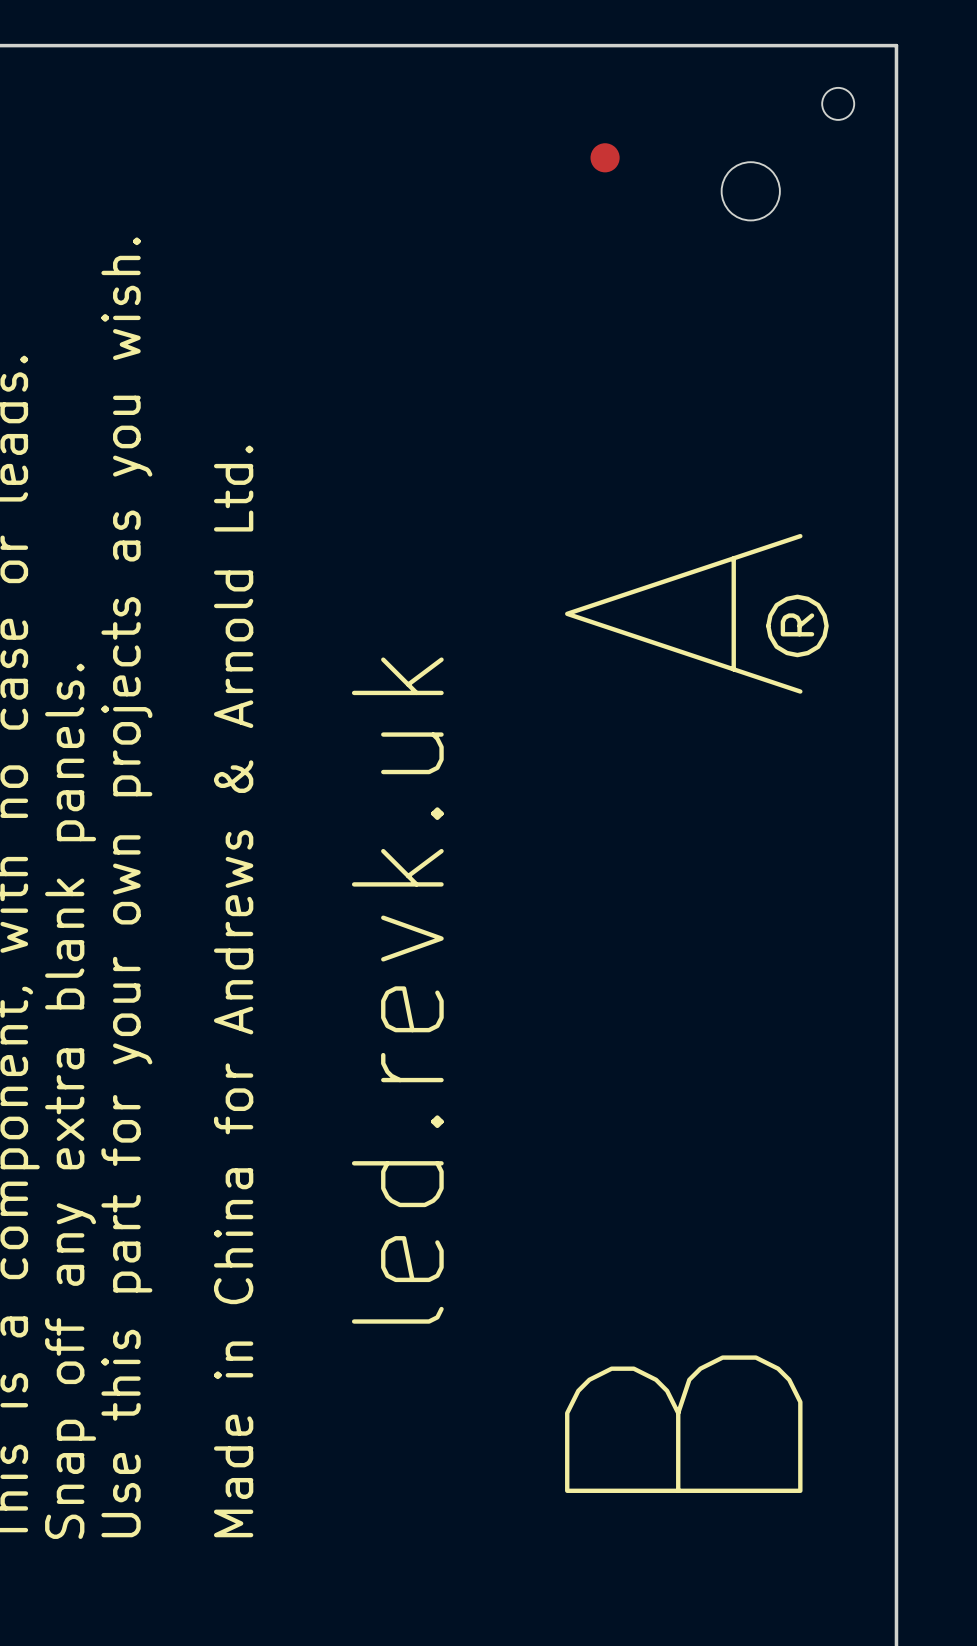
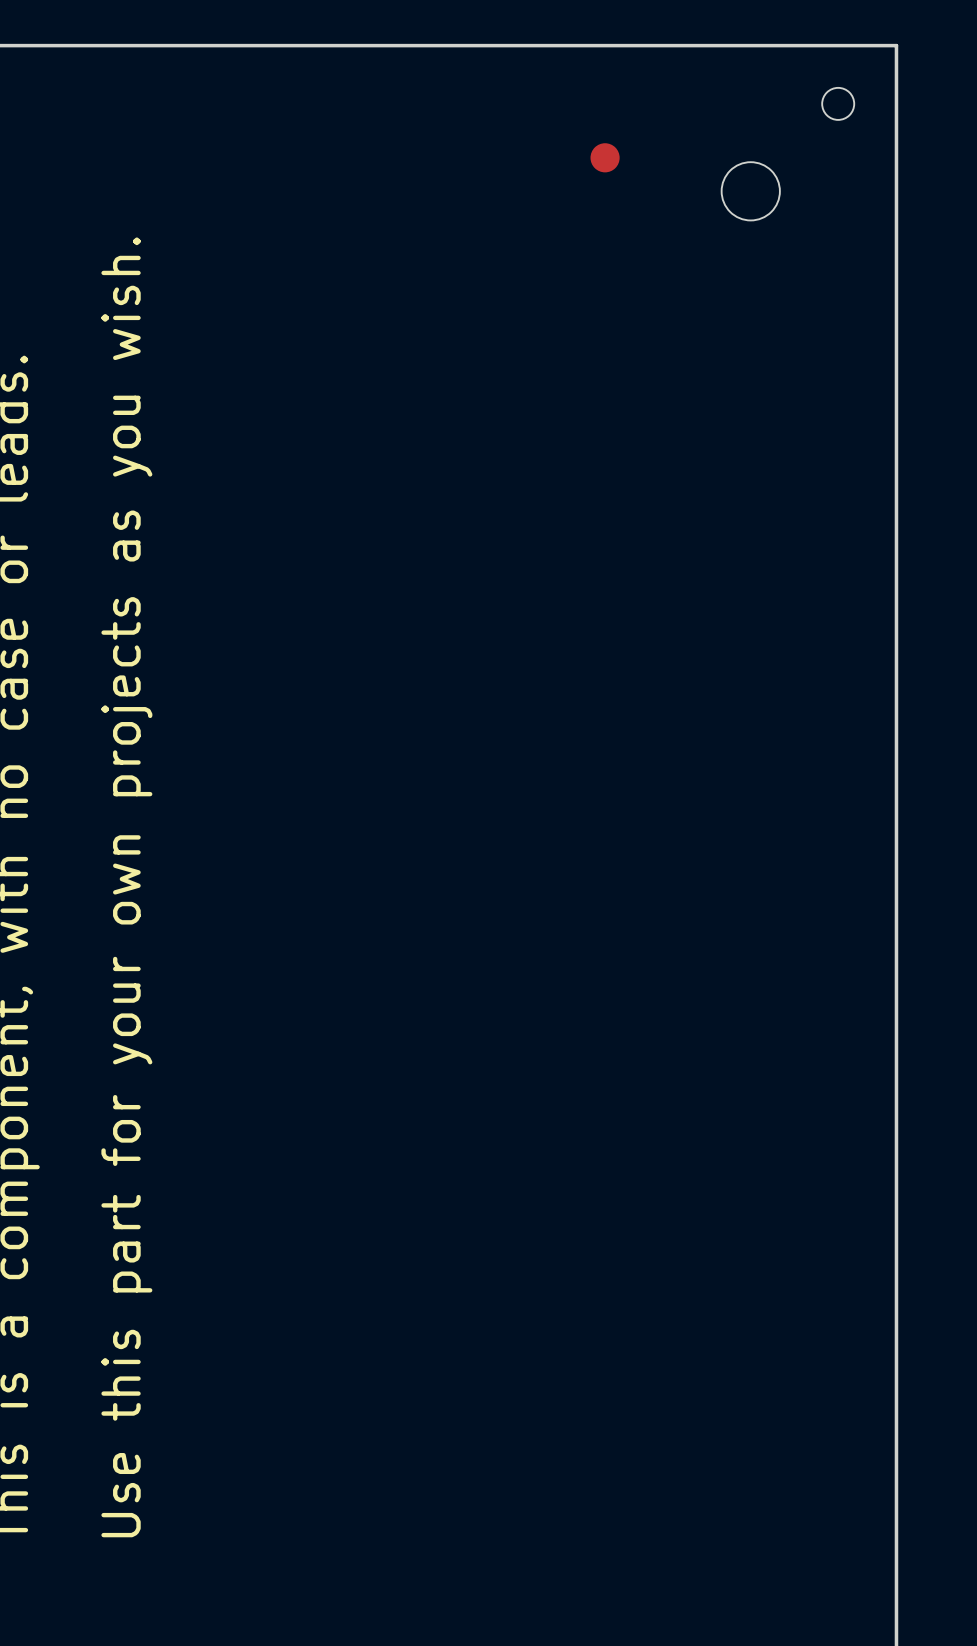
text: A (683, 613) -> none
text: ® (797, 625) -> none
text: led.revk.uk (397, 990) -> none
text: Made in China for Andrews & Arnold Ltd. (233, 991) -> none
text: Snap off any extra blank panels. (70, 1101) -> none
text: B (683, 1424) -> none

